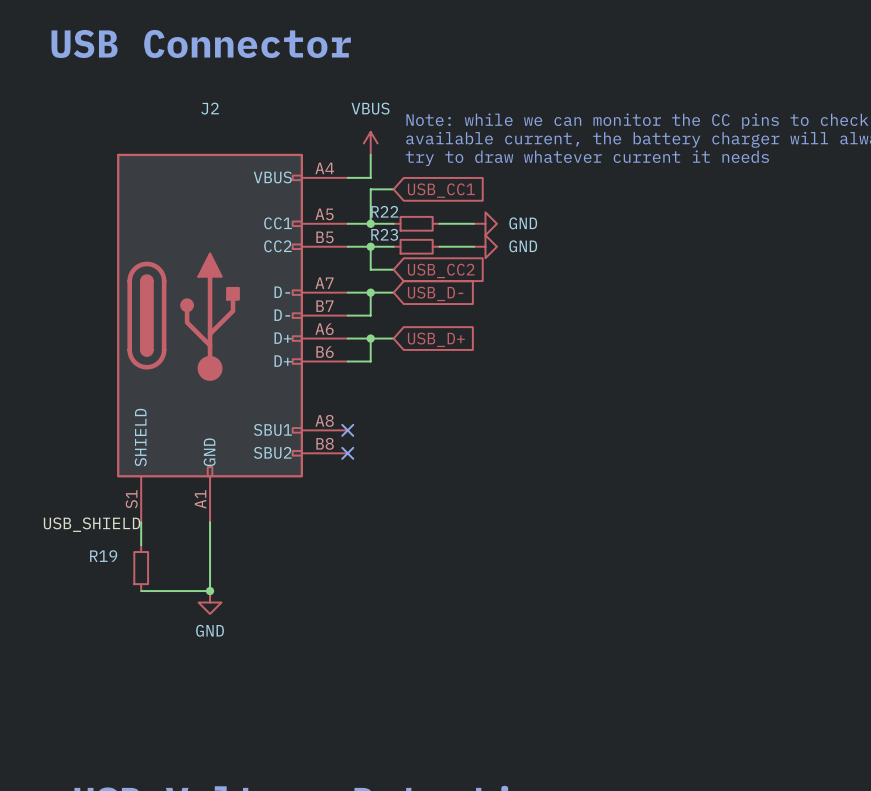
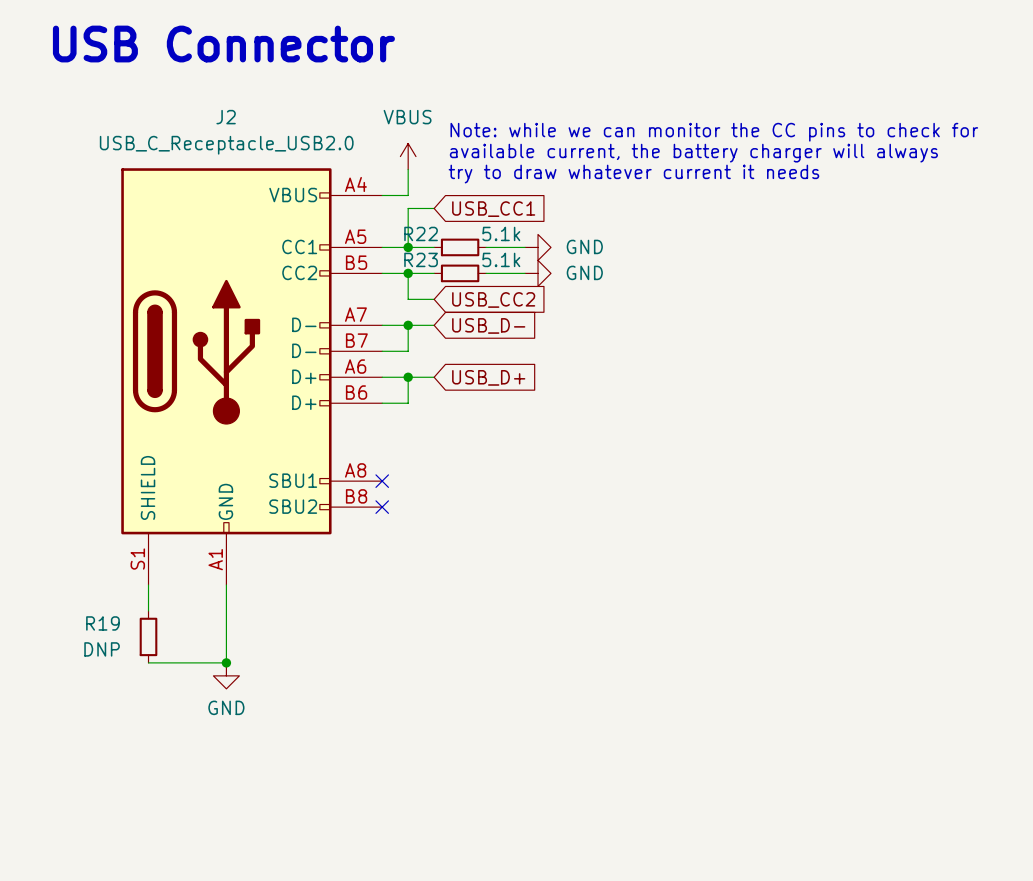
J2 value: none -> USB_C_Receptacle_USB2.0 (226, 145)
R22 value: none -> 5.1k (501, 233)
R23 value: none -> 5.1k (501, 259)
label: USB_SHIELD (92, 524) -> none
R19 value: none -> DNP (102, 649)

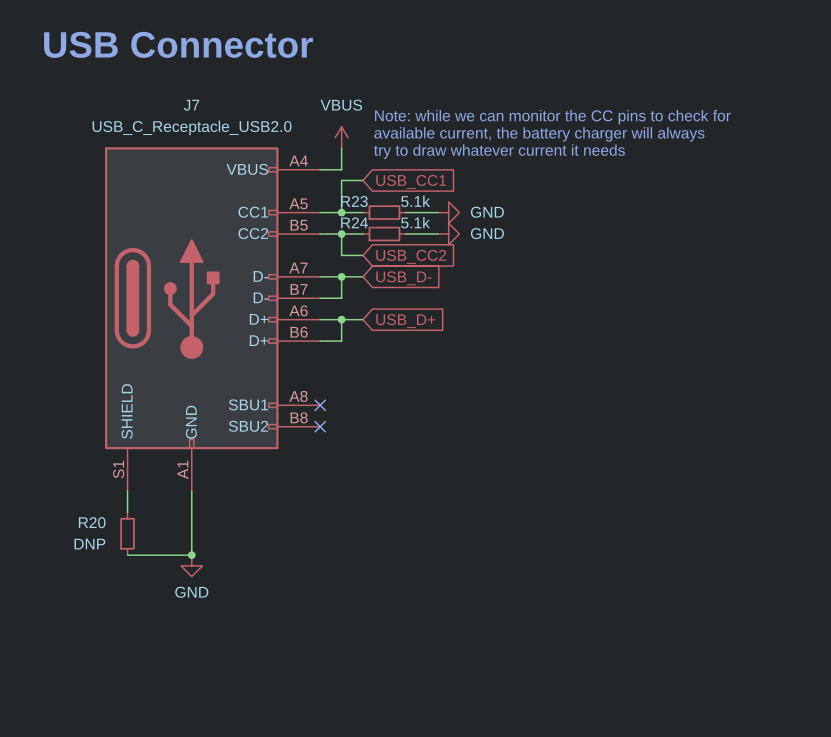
J2 name: J2 (226, 117) -> J7 (191, 105)
R22 name: R22 (421, 233) -> R23 (354, 201)
R23 name: R23 (421, 259) -> R24 (354, 222)
R19 name: R19 (102, 623) -> R20 (92, 522)

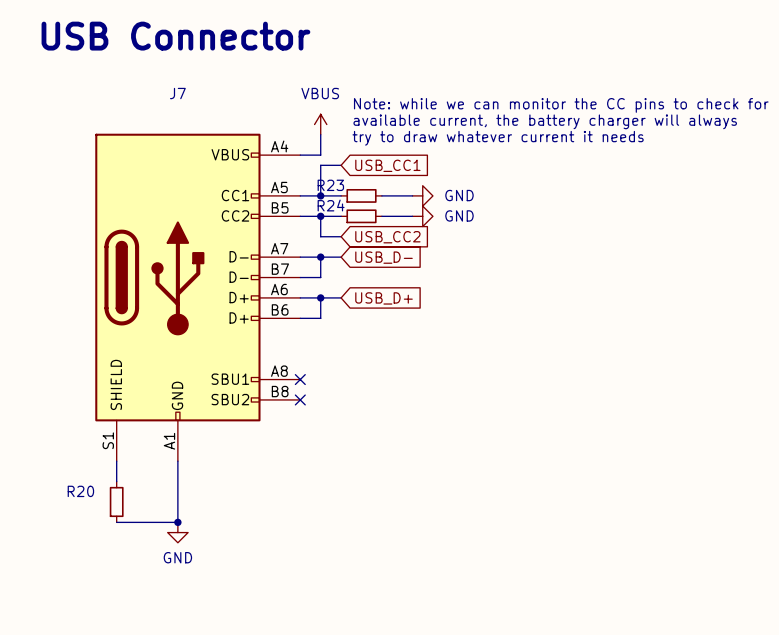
J7 value: USB_C_Receptacle_USB2.0 (192, 127) -> none
R23 value: 5.1k (415, 201) -> none
R24 value: 5.1k (415, 222) -> none
R20 value: DNP (89, 544) -> none

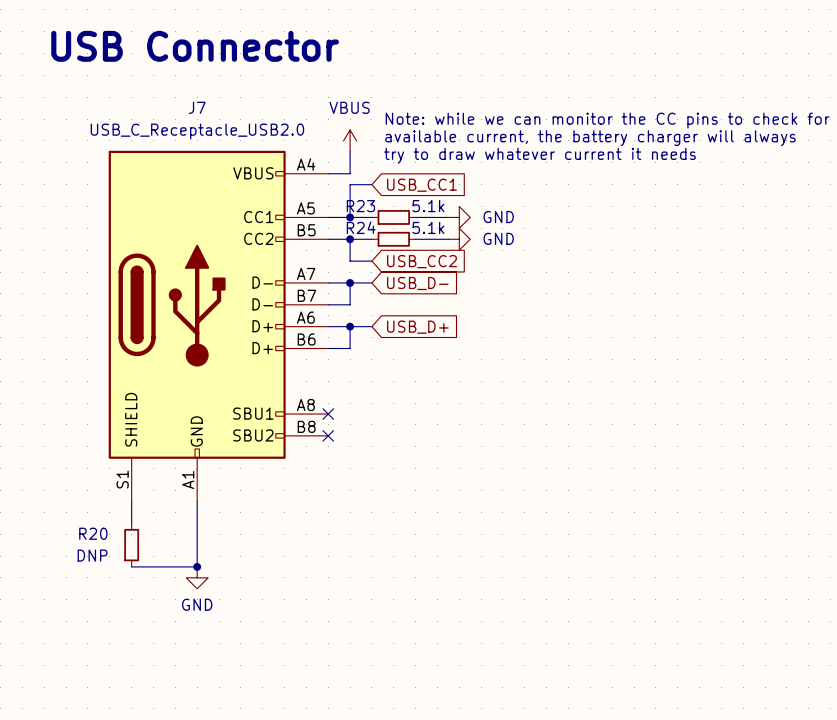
J7 value: none -> USB_C_Receptacle_USB2.0 (197, 131)
R23 value: none -> 5.1k (428, 206)
R24 value: none -> 5.1k (428, 227)
R20 value: none -> DNP (92, 555)

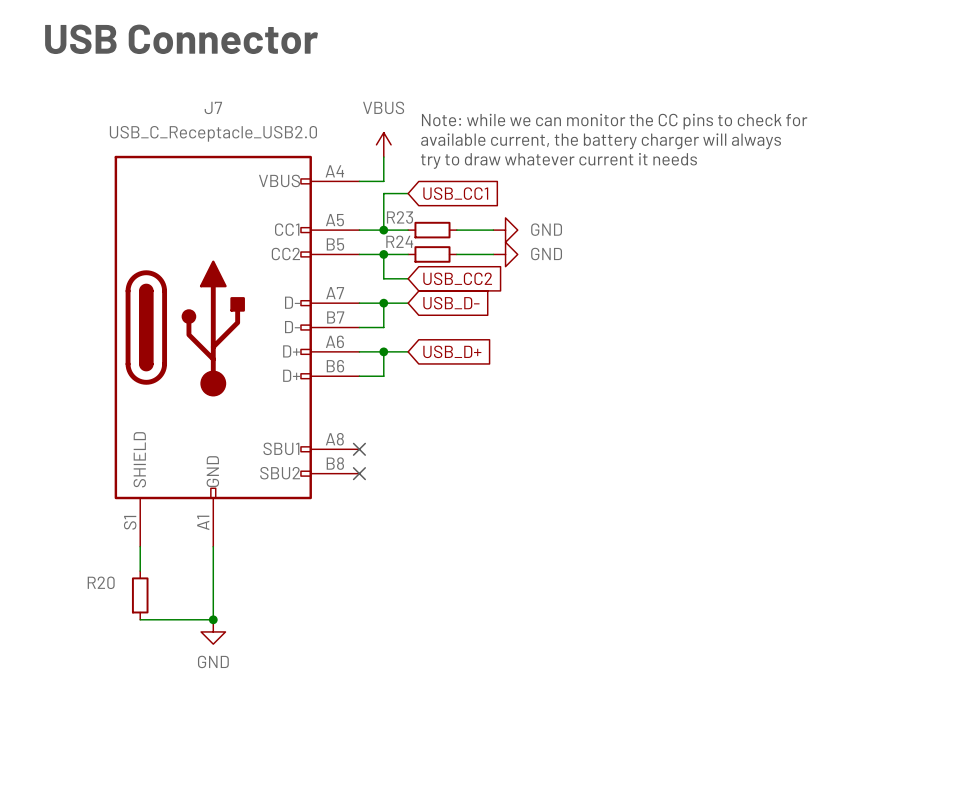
R23 value: 5.1k (428, 206) -> none
R24 value: 5.1k (428, 227) -> none
R20 value: DNP (92, 555) -> none

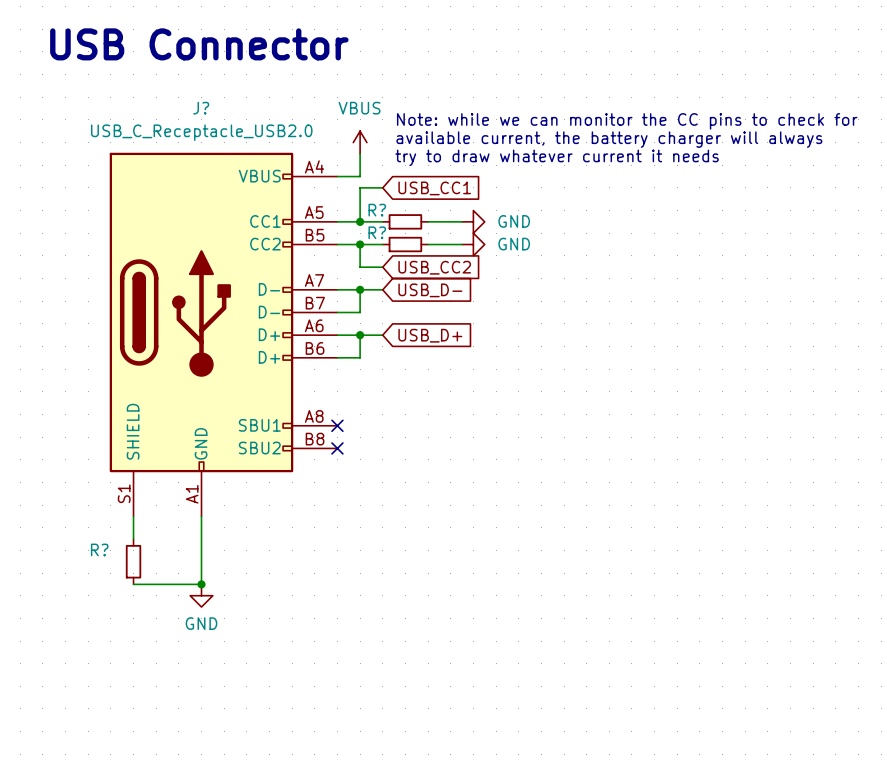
J7 name: J7 (213, 107) -> J? (201, 108)
R23 name: R23 (400, 217) -> R? (377, 210)
R24 name: R24 (399, 241) -> R? (377, 232)
R20 name: R20 (101, 582) -> R? (99, 549)

